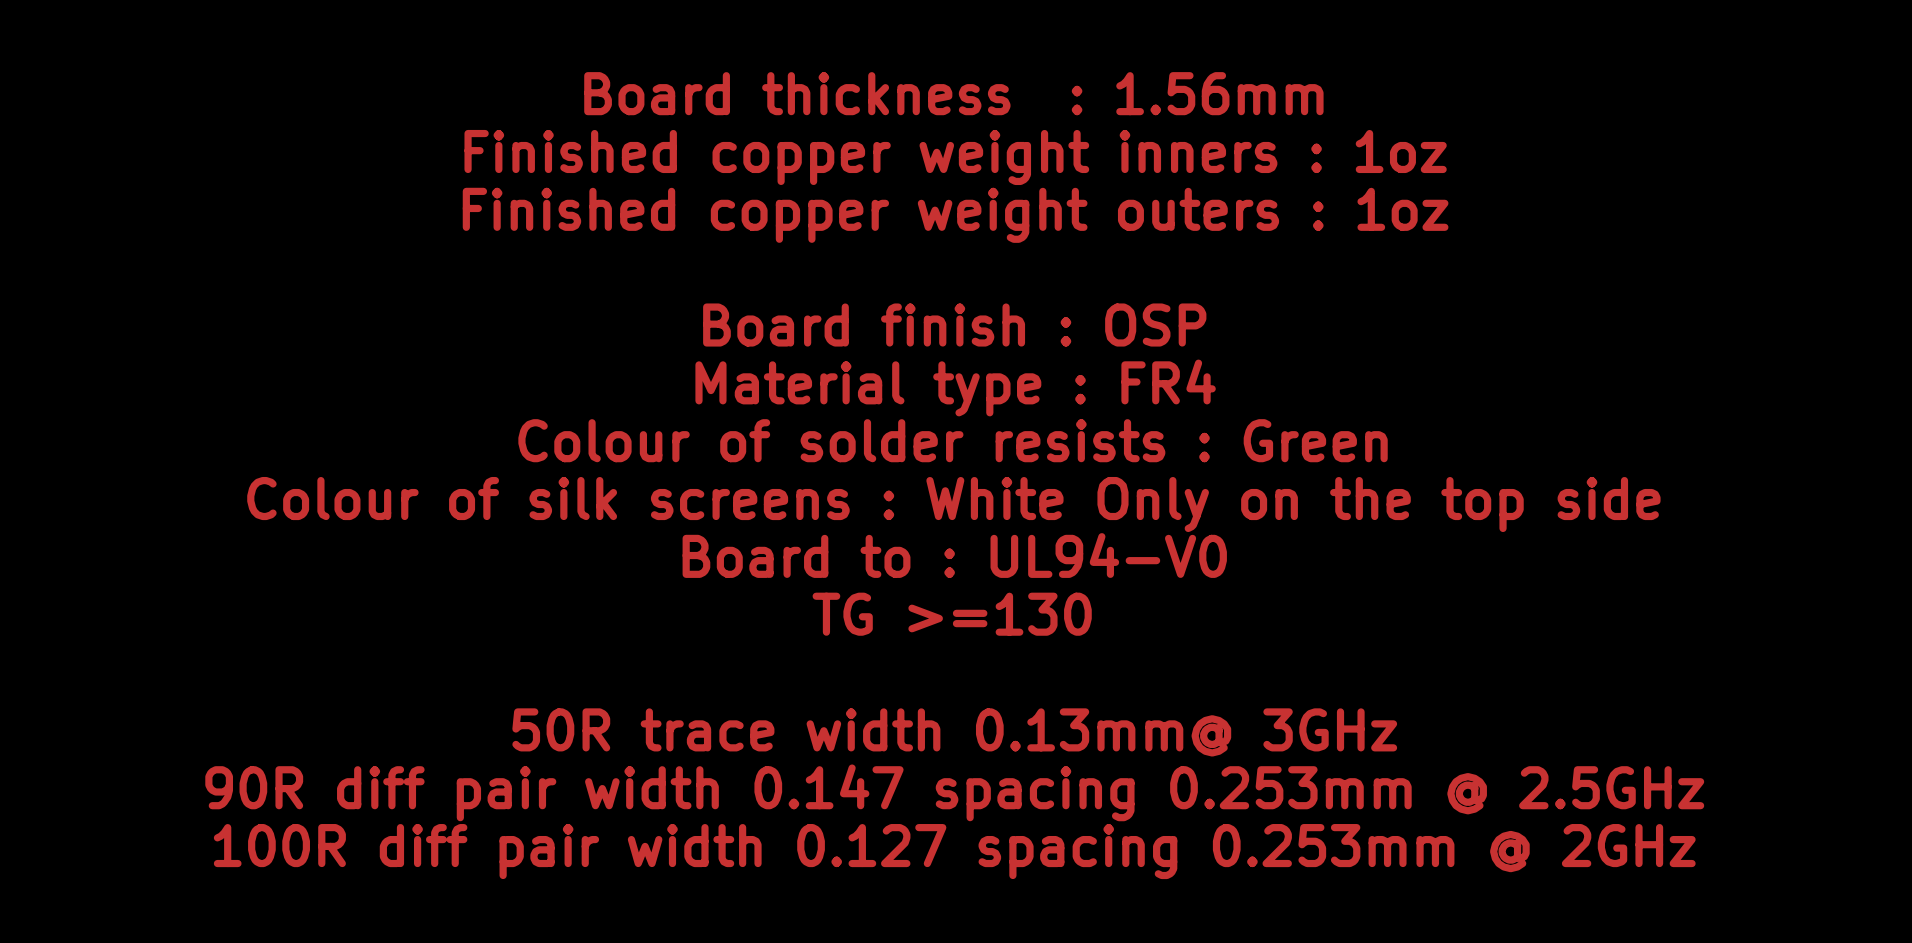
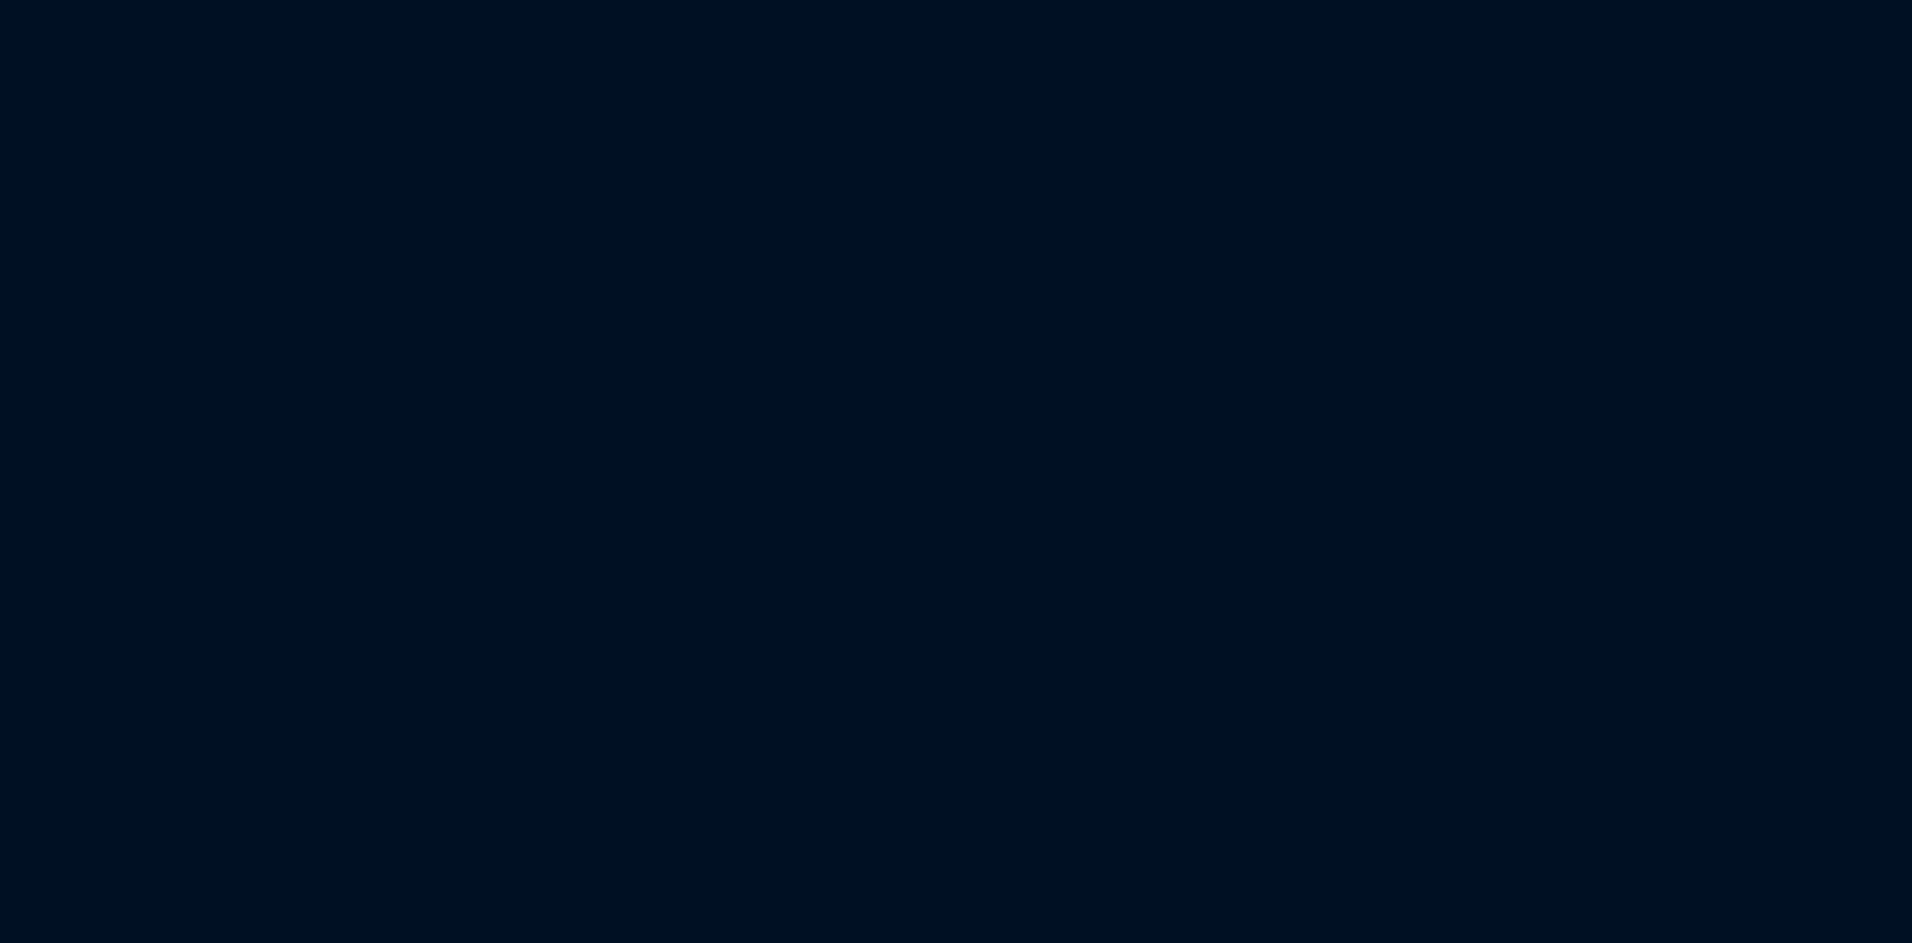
text: Board thickness : 1.56mm (953, 93) -> none
text: Finished copper weight inners : 1oz (955, 157) -> none
text: Finished copper weight outers : 1oz (955, 215) -> none
text: Board finish : OSP (954, 325) -> none
text: Material type : FR4 (955, 387) -> none
text: Colour of solder resists : Green (953, 440) -> none
text: Colour of silk screens : White Only on the top side (953, 504) -> none
text: Board to : UL94-V0 (954, 555) -> none
text: TG >=130 (952, 614) -> none
text: 50R trace width 0.13mm@ 3GHz (954, 732) -> none
text: 90R diff pair width 0.147 spacing 0.253mm @ 2.5GHz (954, 792) -> none
text: 100R diff pair width 0.127 spacing 0.253mm @ 2GHz (954, 851) -> none

